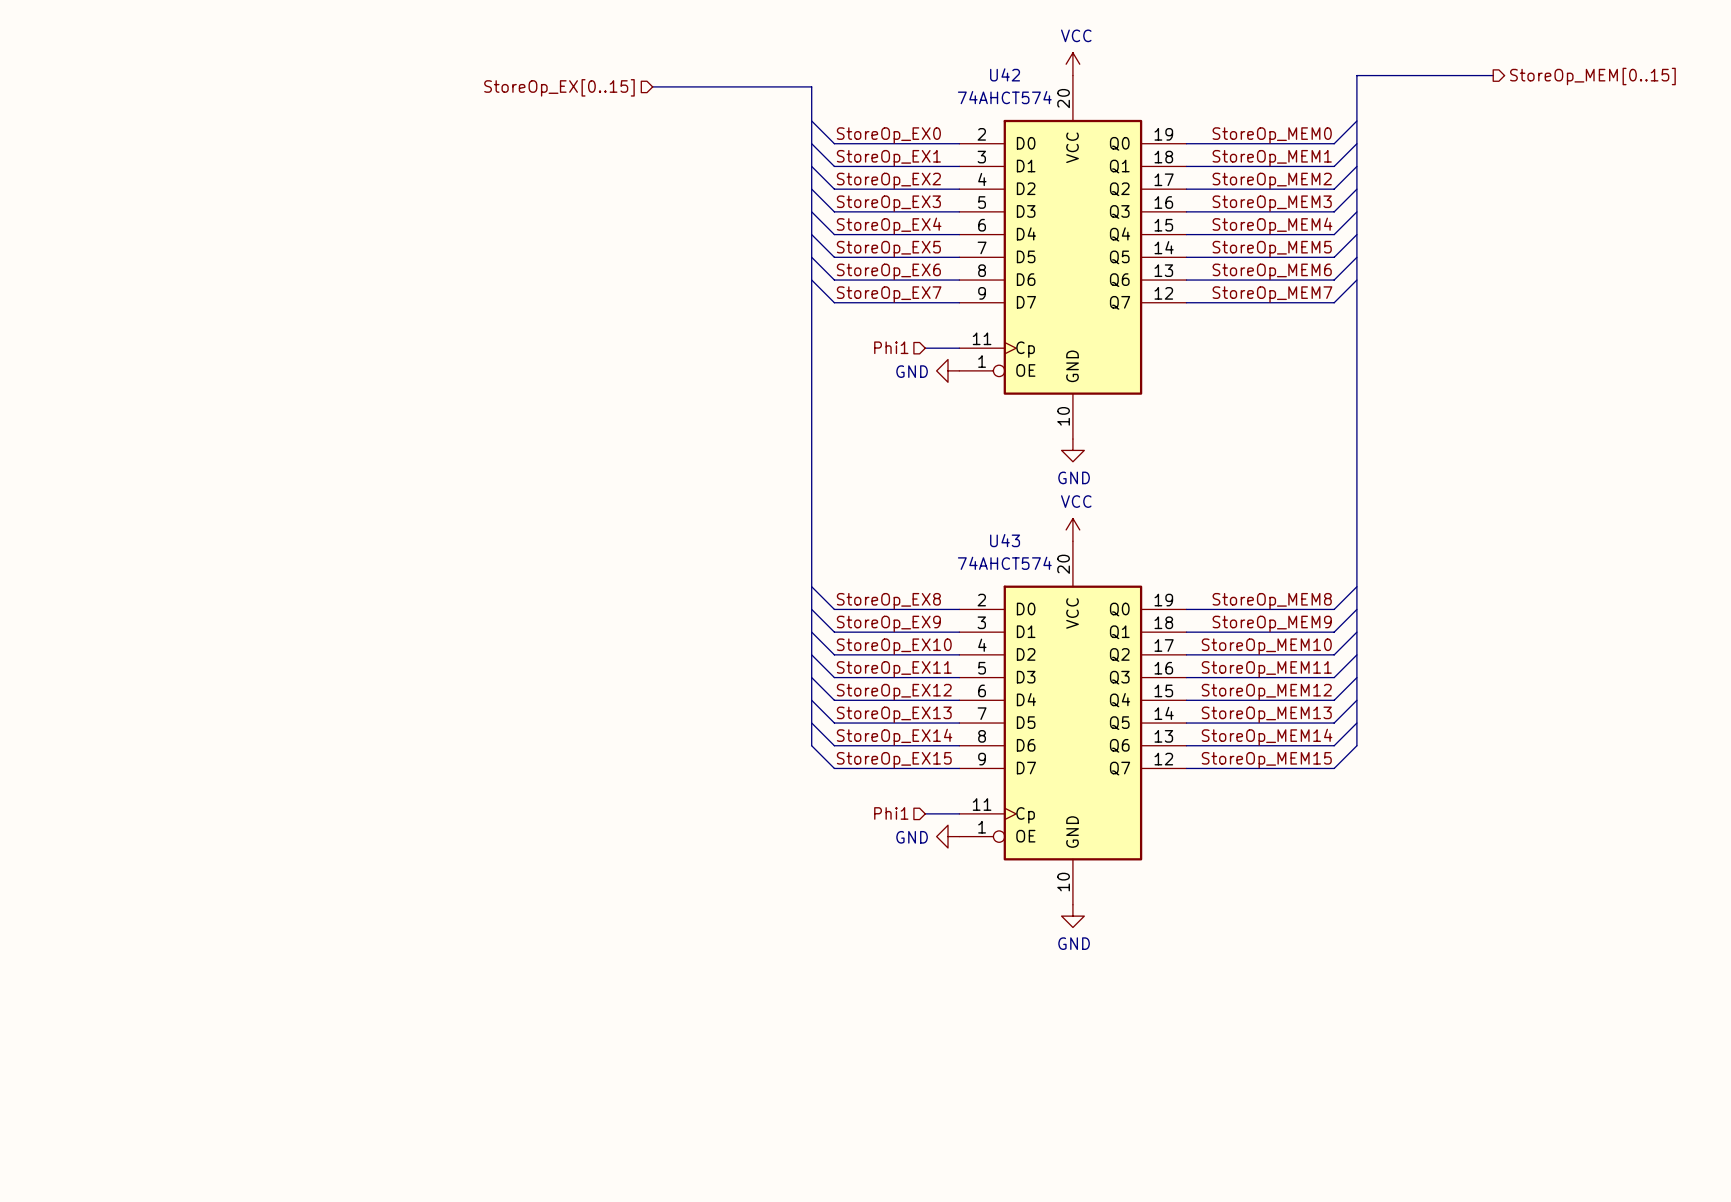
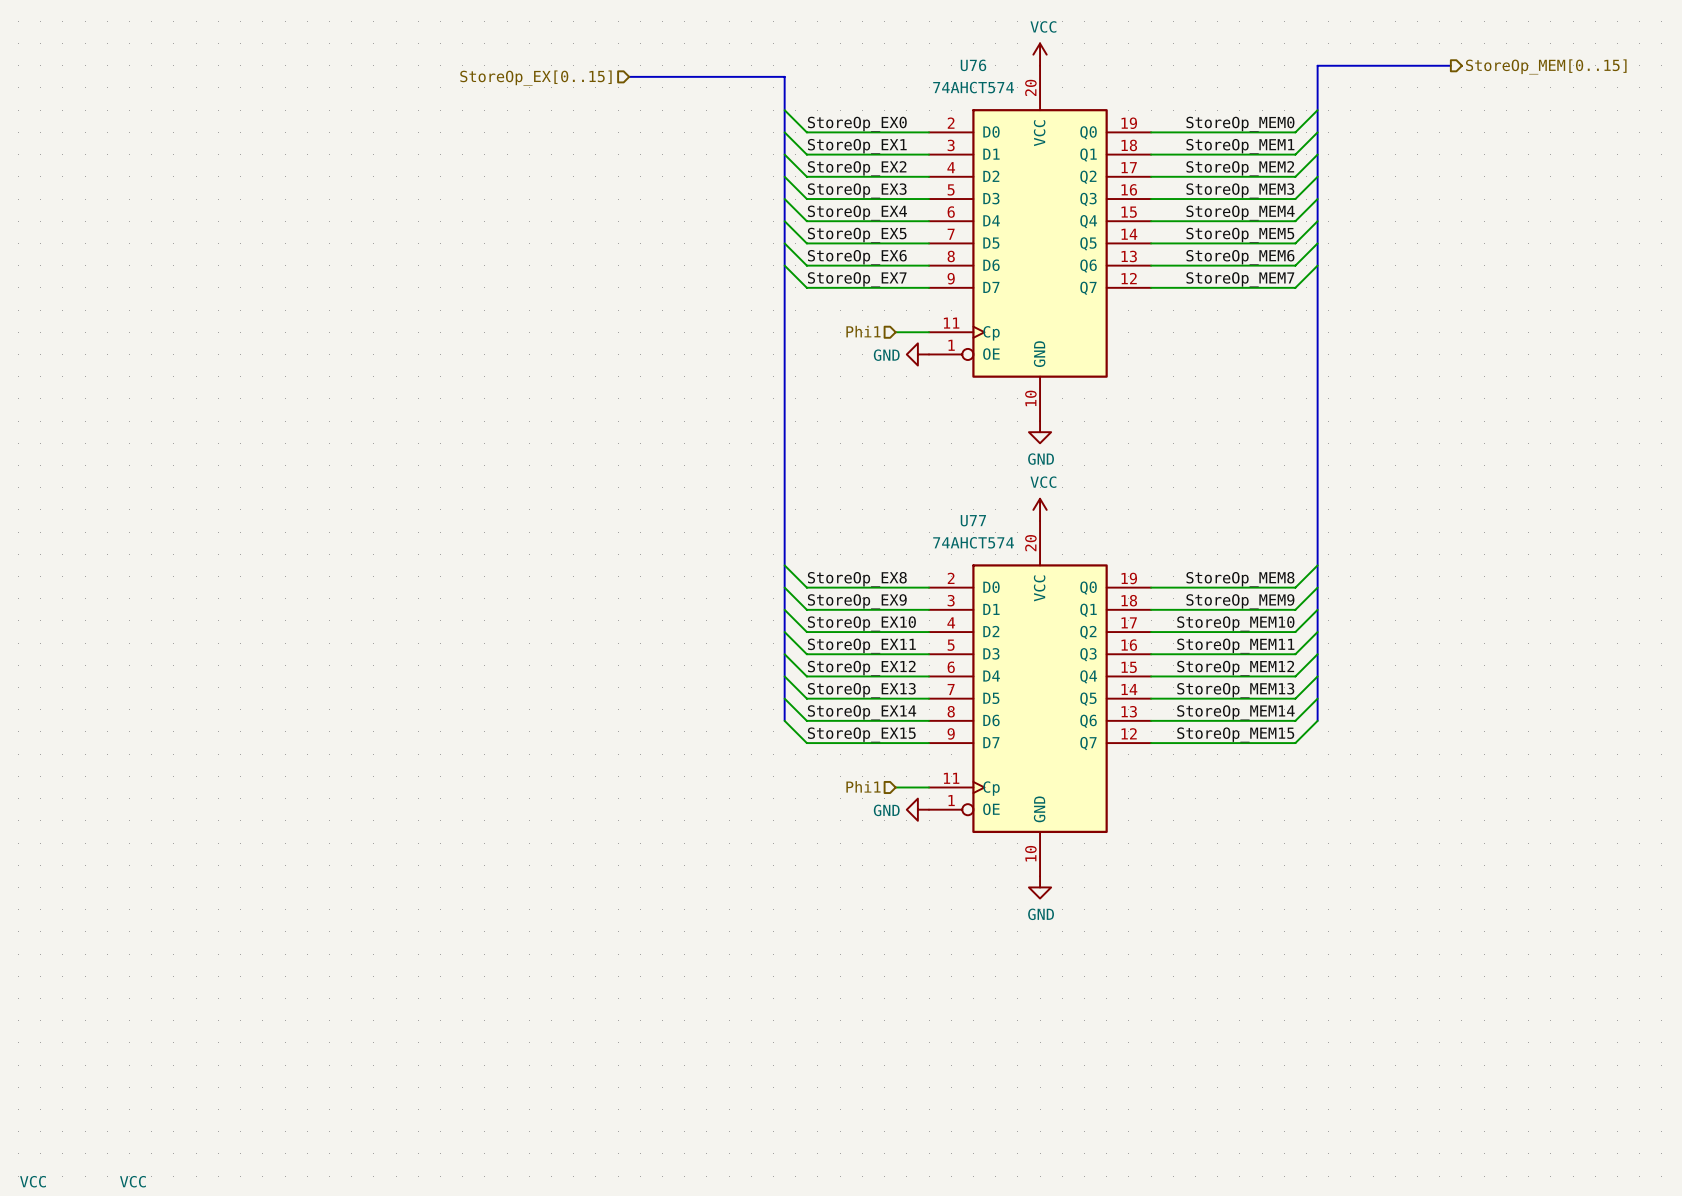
U42 name: U42 (1005, 74) -> U76 (973, 65)
U43 name: U43 (1005, 540) -> U77 (973, 520)

